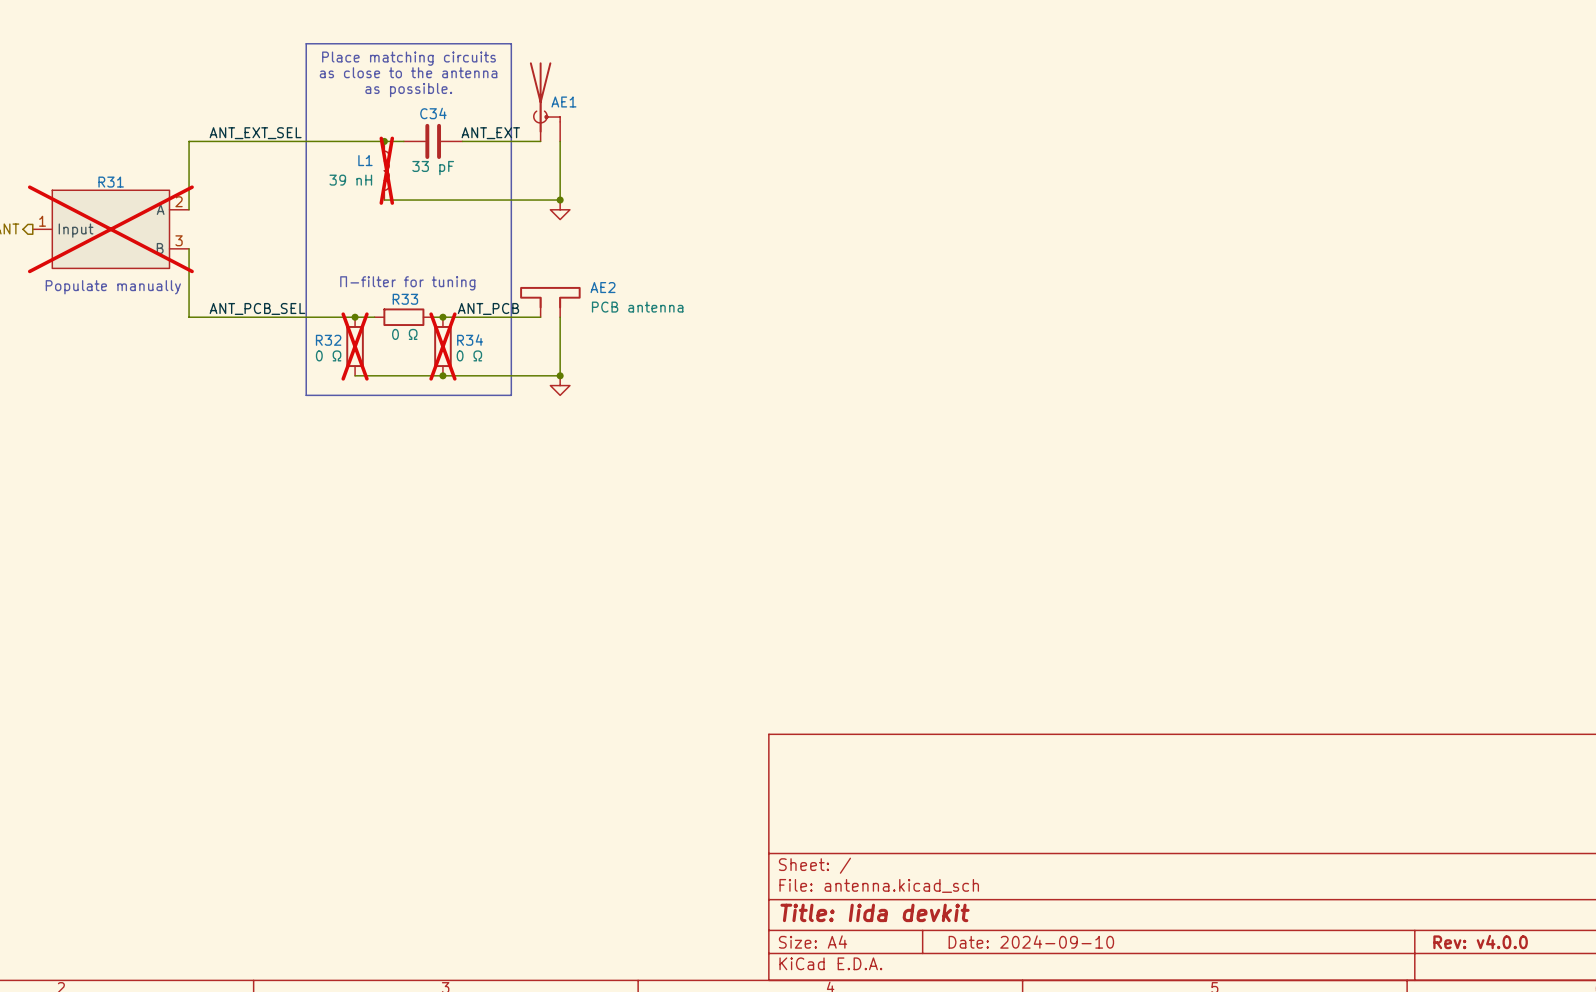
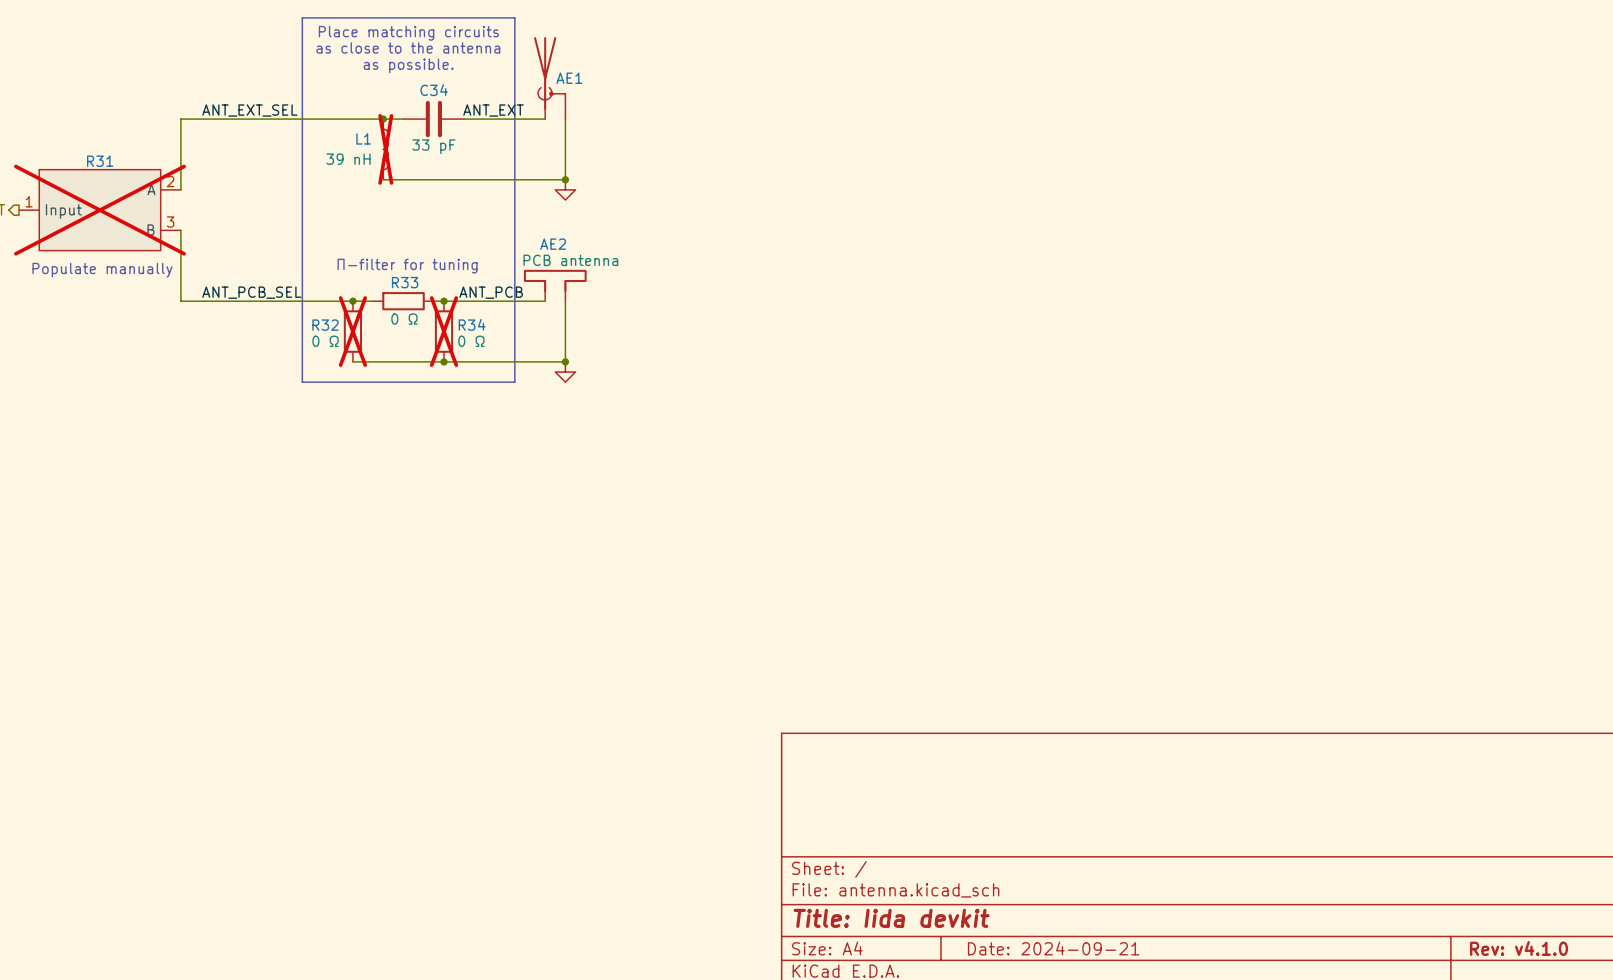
AE2 name position: AE2 (603, 287) -> AE2 (553, 244)
AE2 value position: PCB antenna (637, 307) -> PCB antenna (570, 260)
title block: Date: 2024-09-10 (1031, 942) -> Date: 2024-09-21 (1053, 948)
title block: Rev: v4.0.0 (1480, 942) -> Rev: v4.1.0 (1519, 948)

